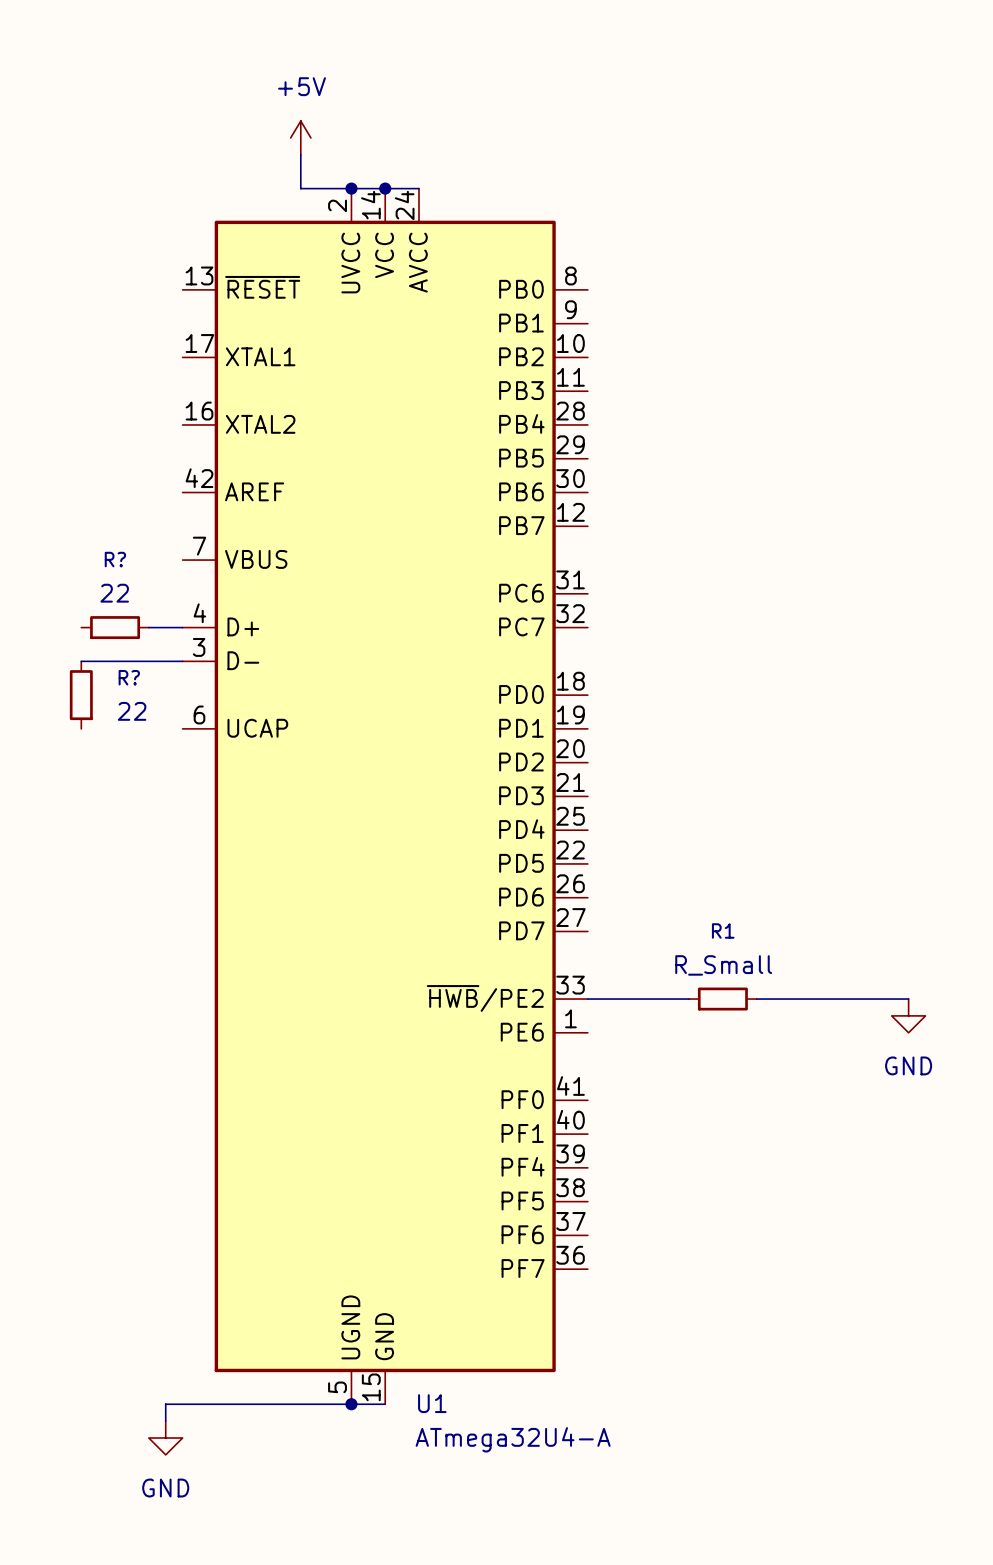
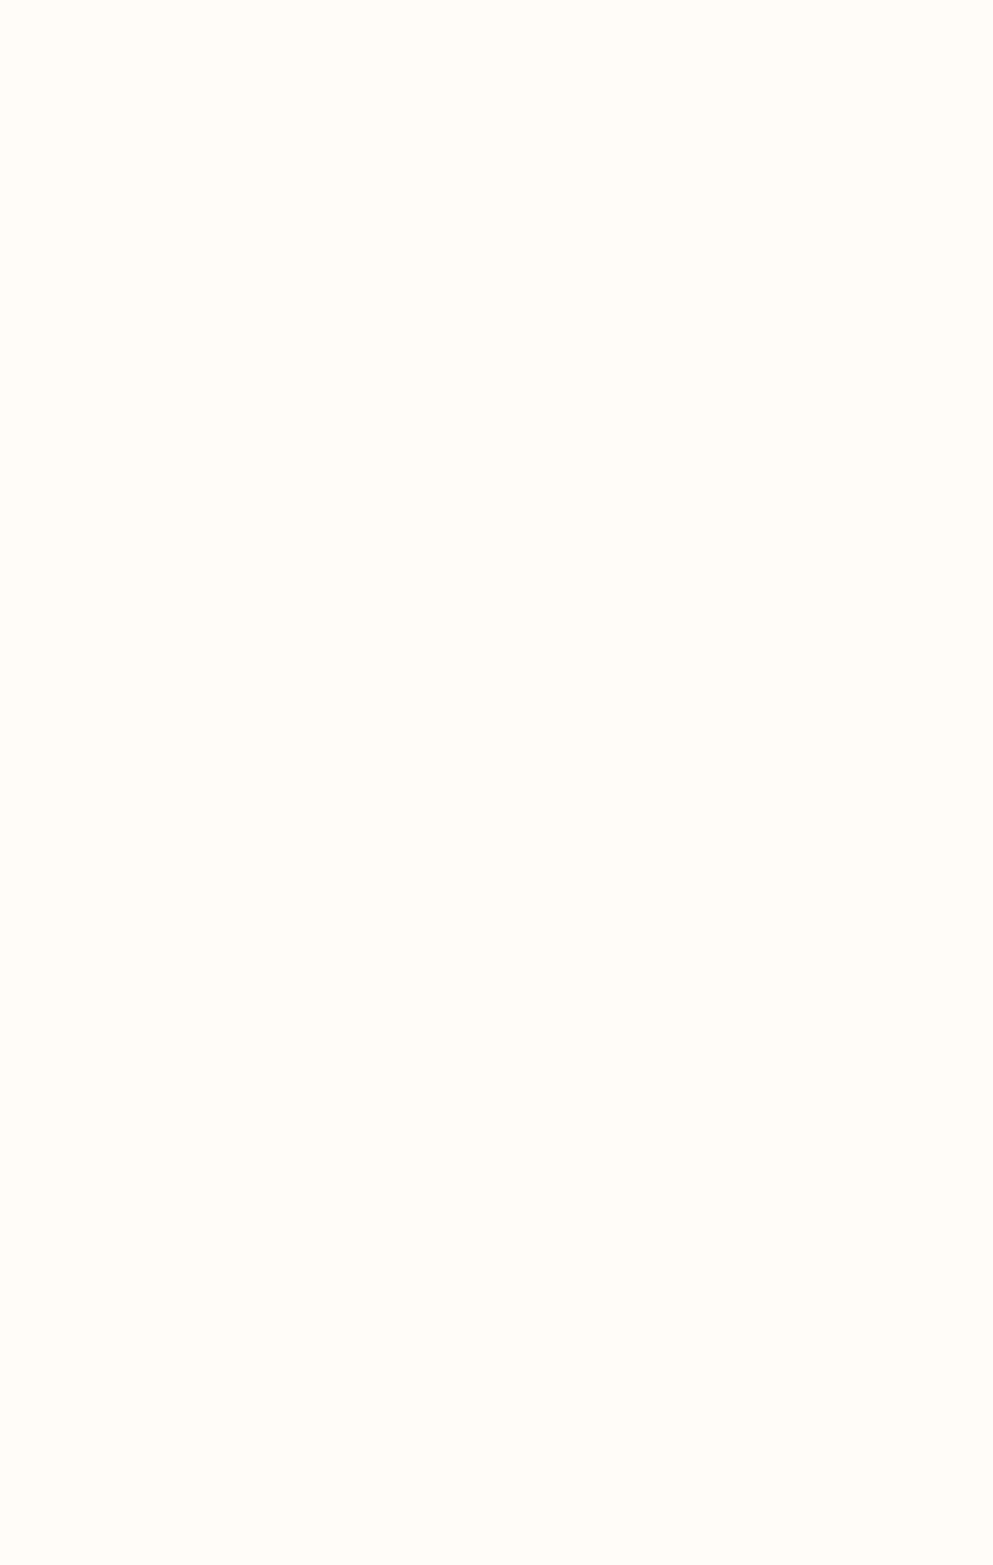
power symbol: +5V (300, 137) -> none
wire: (300, 154) (300, 188) (418, 188) -> none
junction: (351, 188) -> none
junction: (385, 188) -> none
R?: 22 (115, 627) -> none
wire: (148, 627) (182, 627) -> none
wire: (81, 661) (182, 661) -> none
R?: 22 (81, 695) -> none
U1: ATmega32U4-A (385, 796) -> none
wire: (587, 999) (689, 999) -> none
R1: R_Small (722, 999) -> none
wire: (756, 999) (908, 999) -> none
power symbol: GND (908, 1015) -> none
junction: (351, 1404) -> none
wire: (385, 1404) (165, 1404) (165, 1421) -> none
power symbol: GND (165, 1438) -> none

